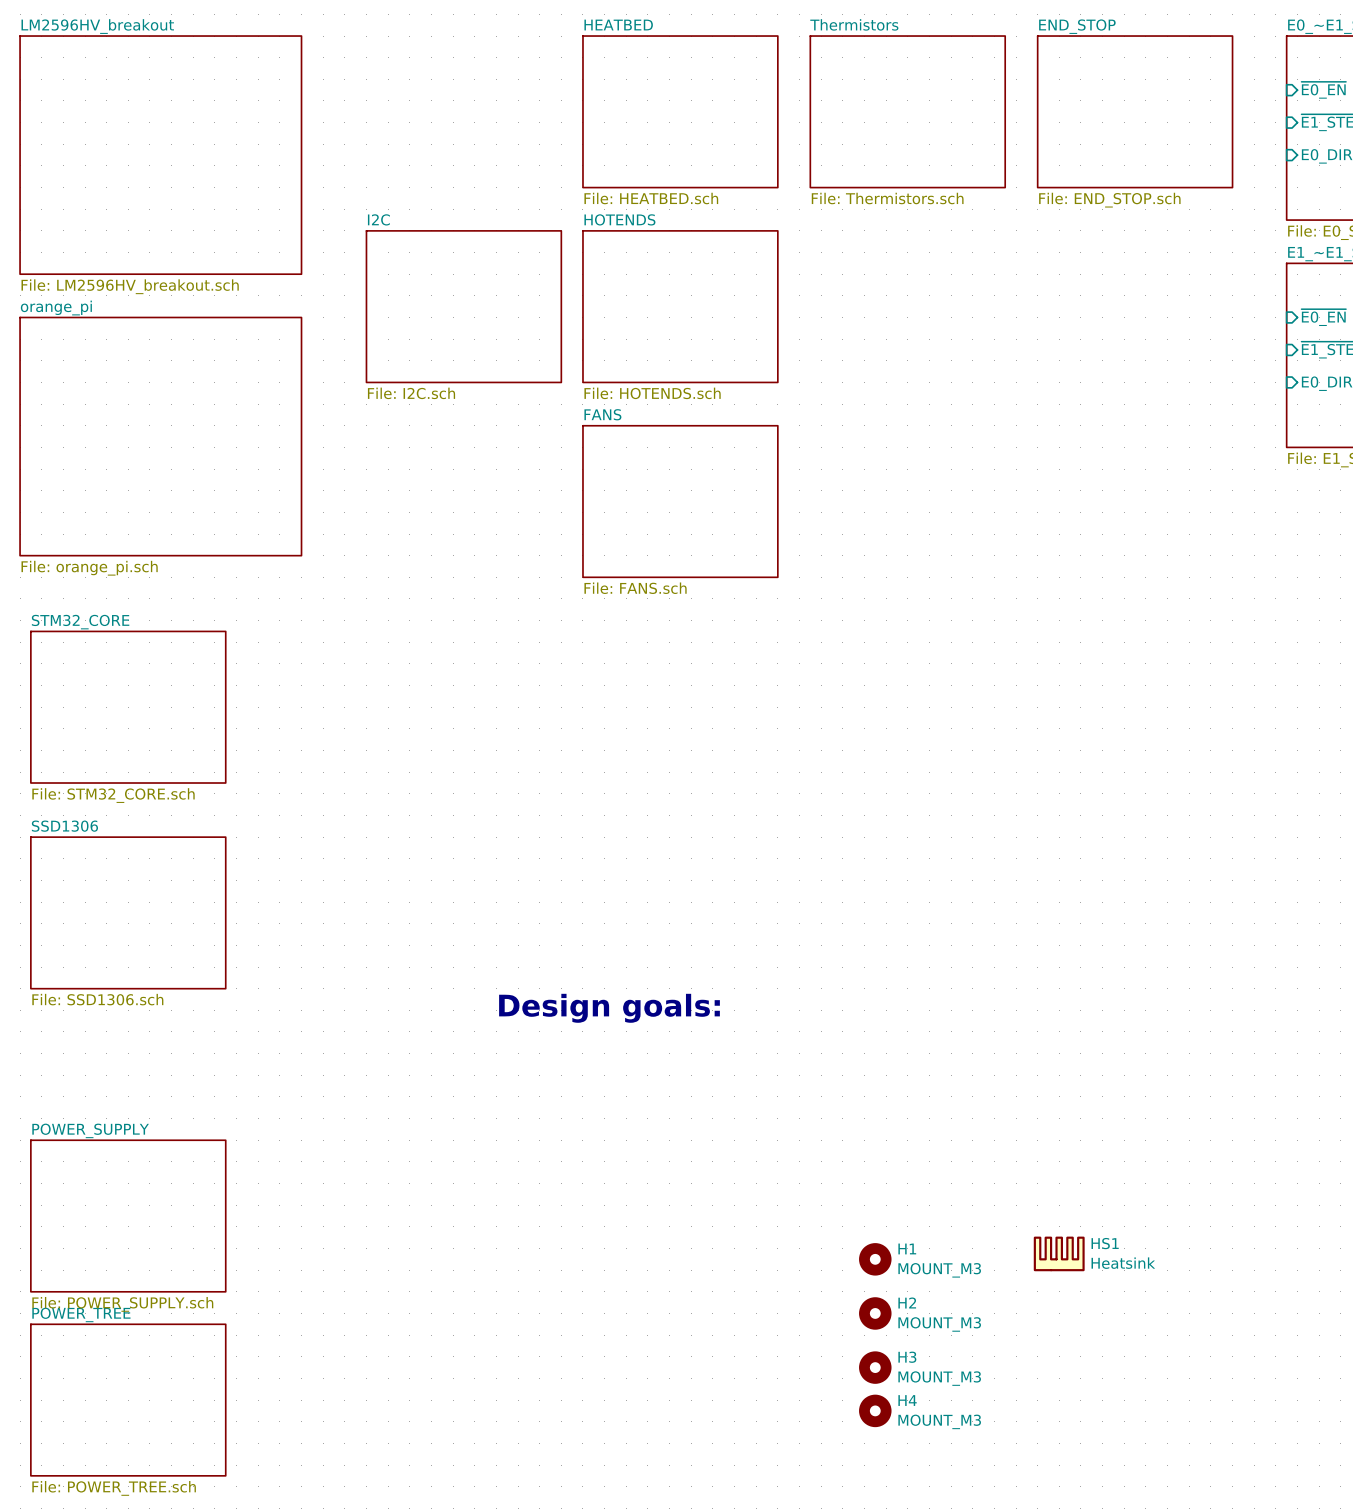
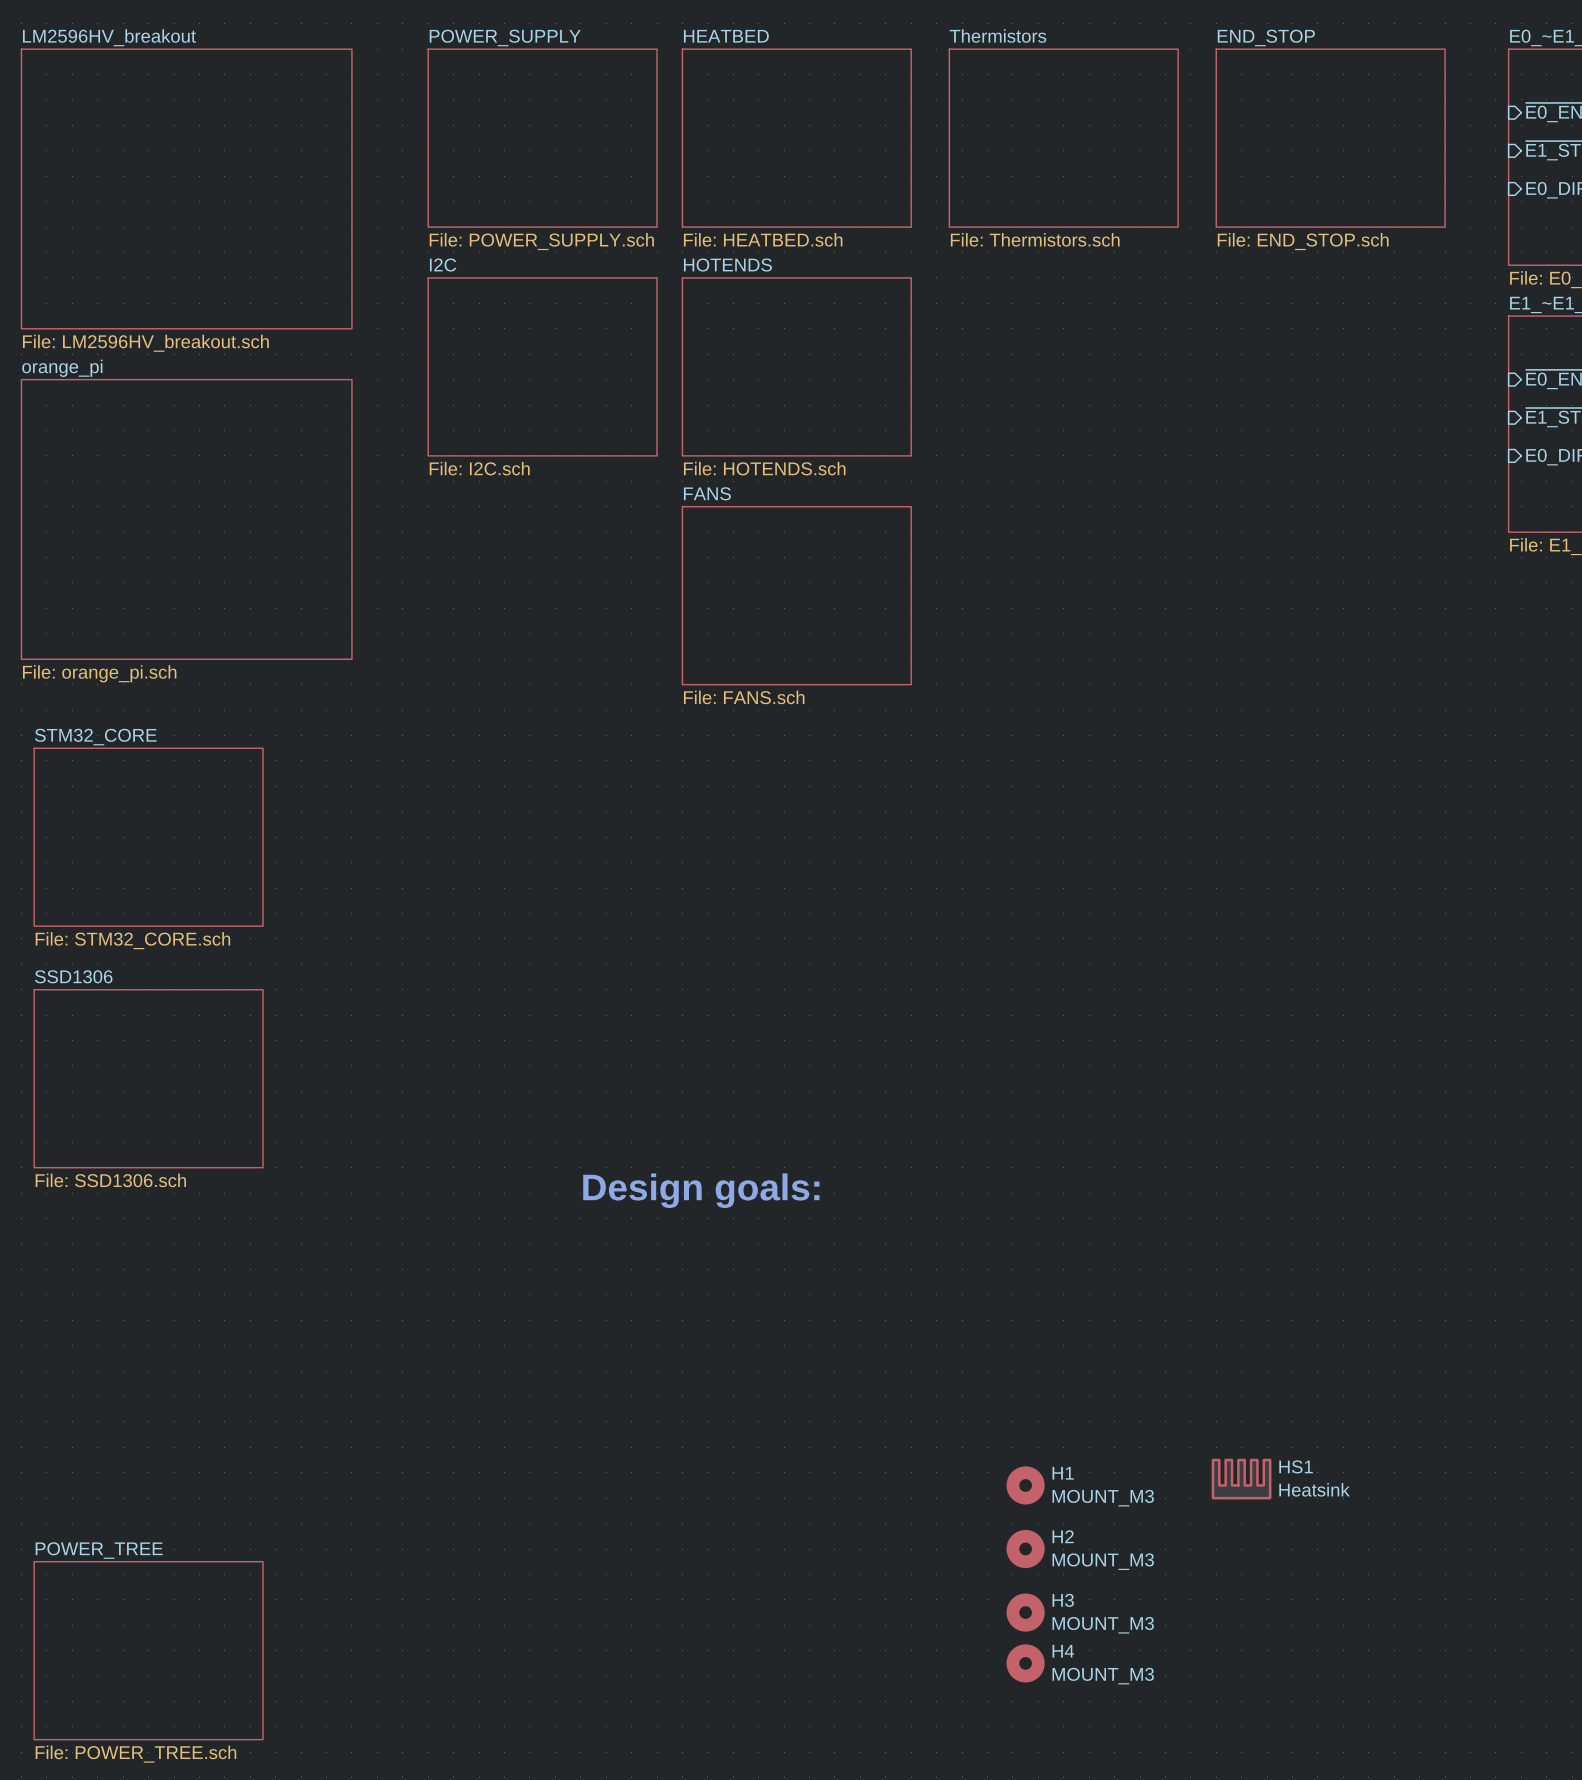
sheet POWER_SUPPLY: none -> File: POWER_SUPPLY.sch (542, 138)
sheet POWER_SUPPLY: File: POWER_SUPPLY.sch (128, 1216) -> none

